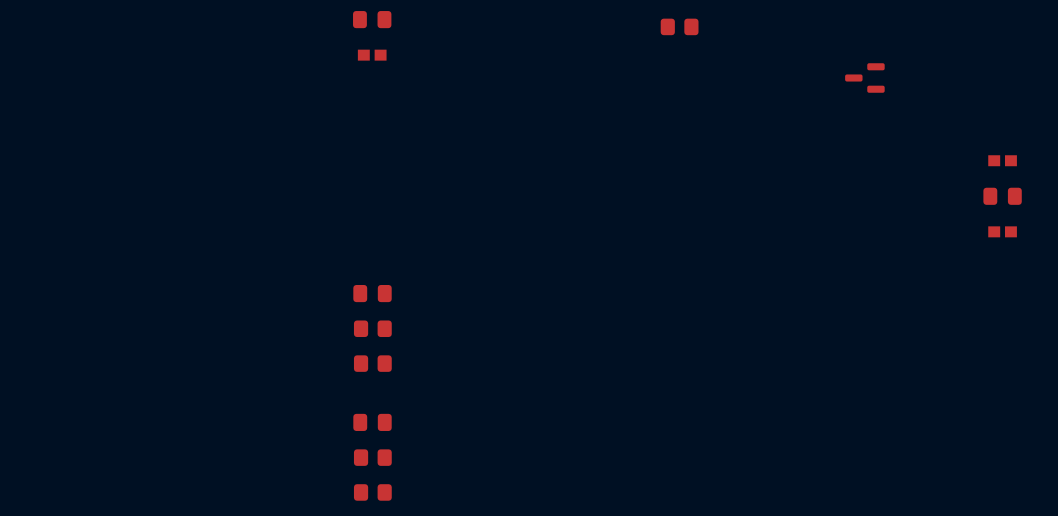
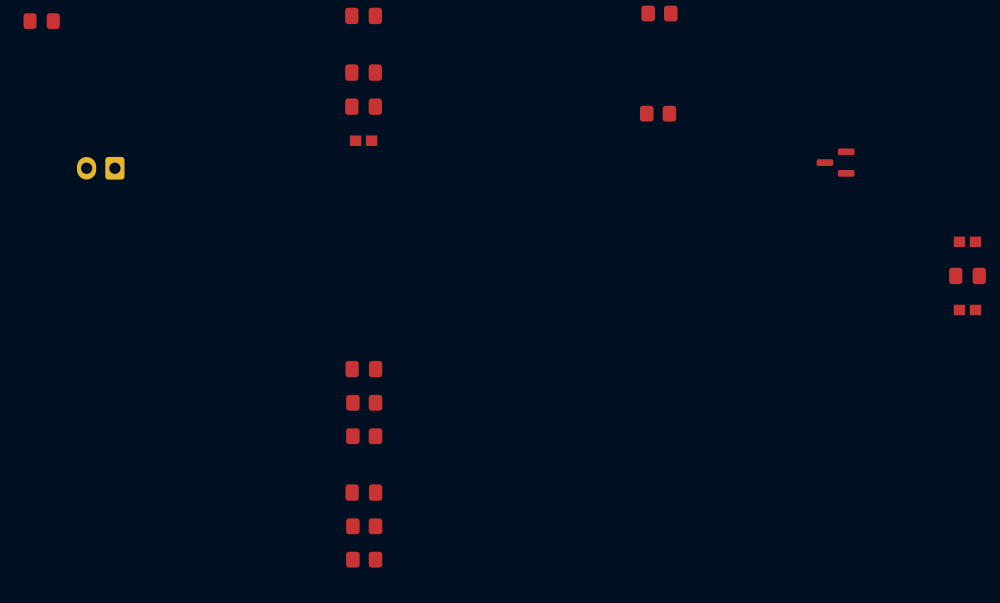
part: none -> (100, 168)

